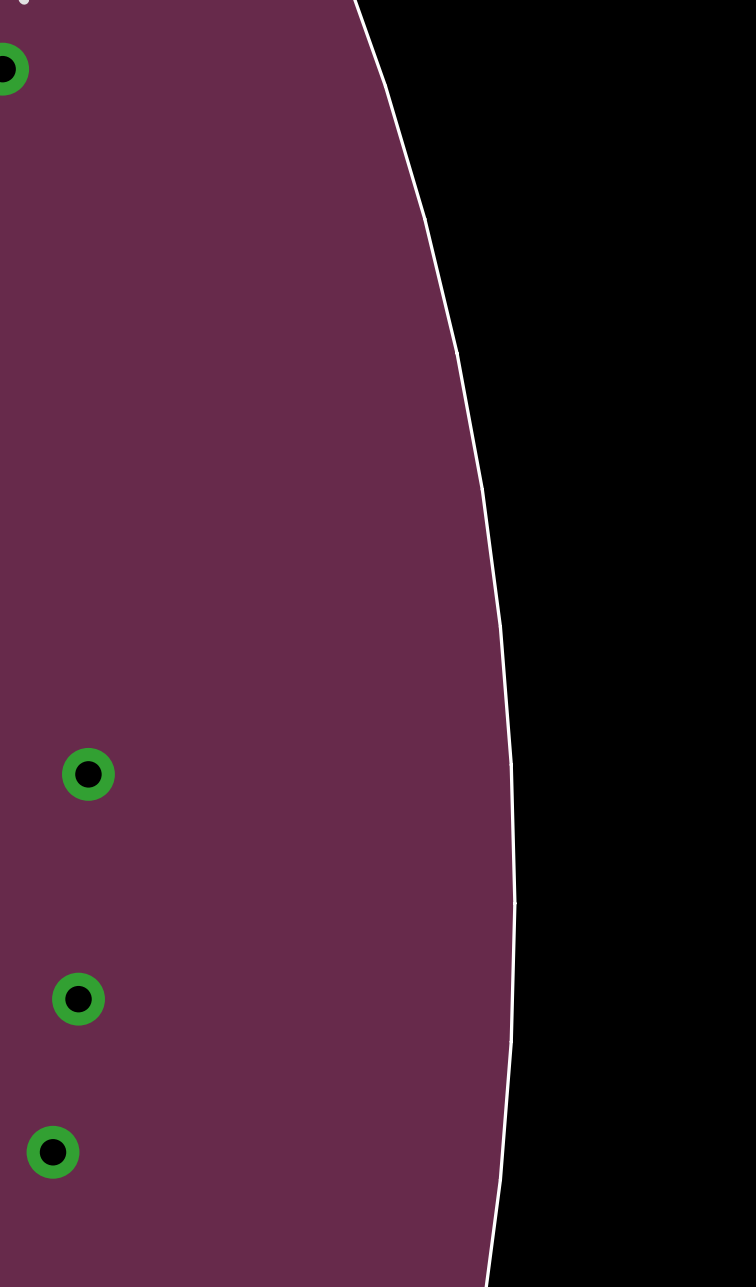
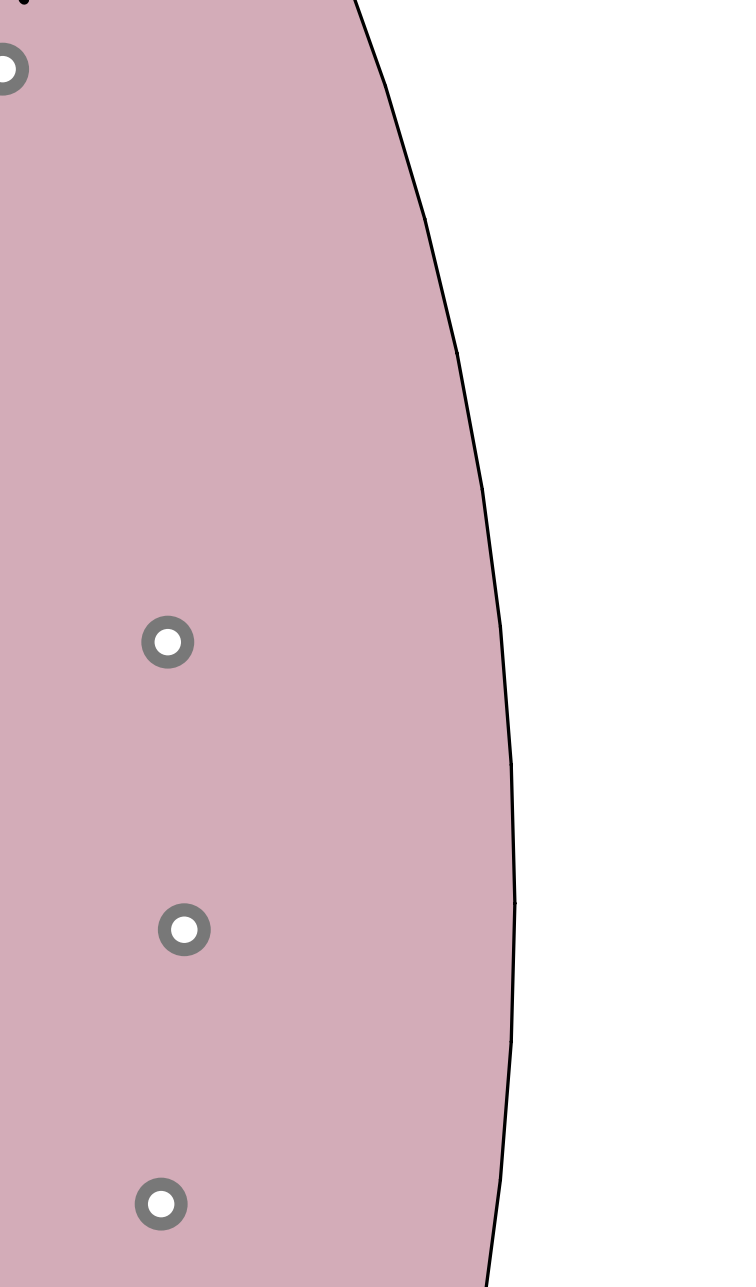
via: none -> (167, 642)
via: (88, 774) -> none
via: none -> (184, 929)
via: (78, 999) -> none
via: (53, 1152) -> none
via: none -> (161, 1204)

